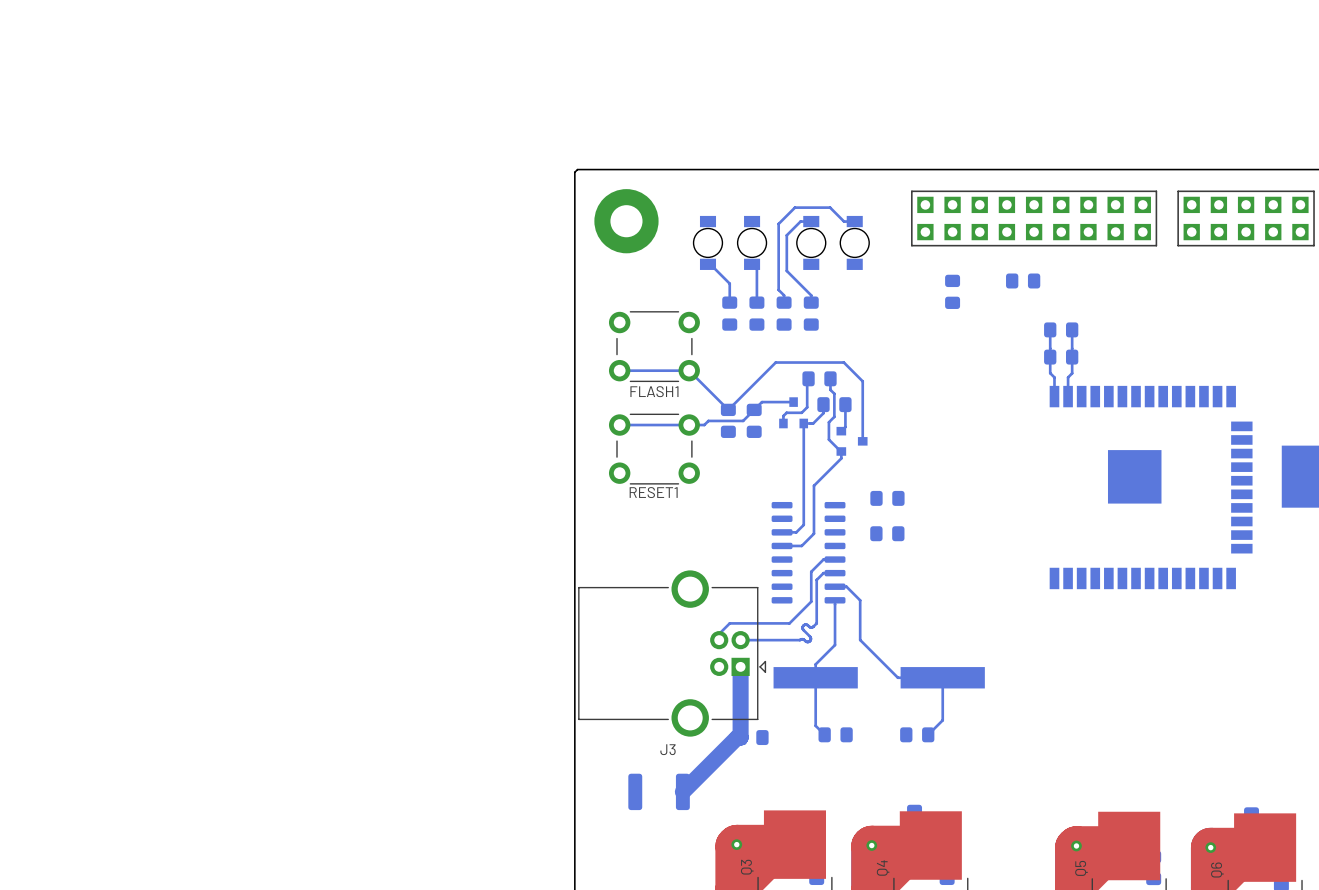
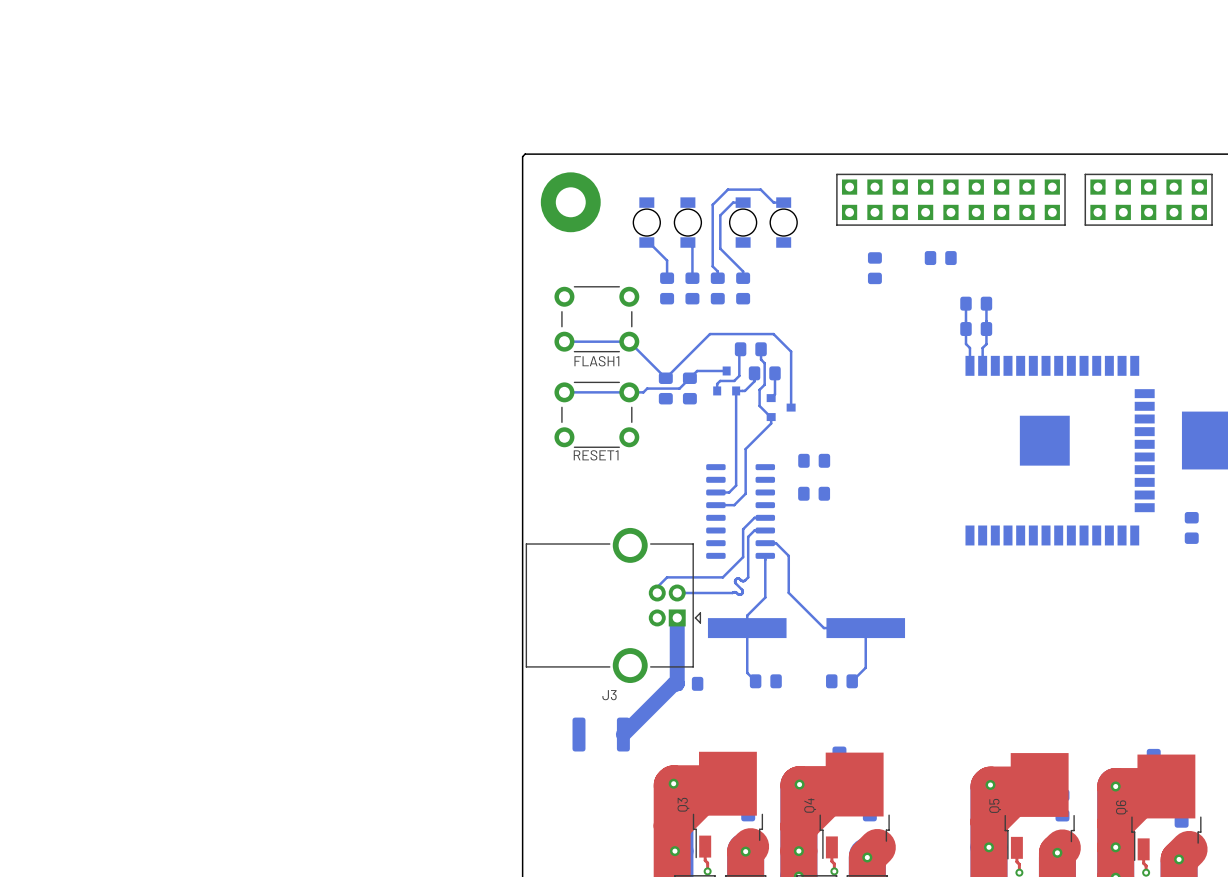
part: none -> (1191, 527)

